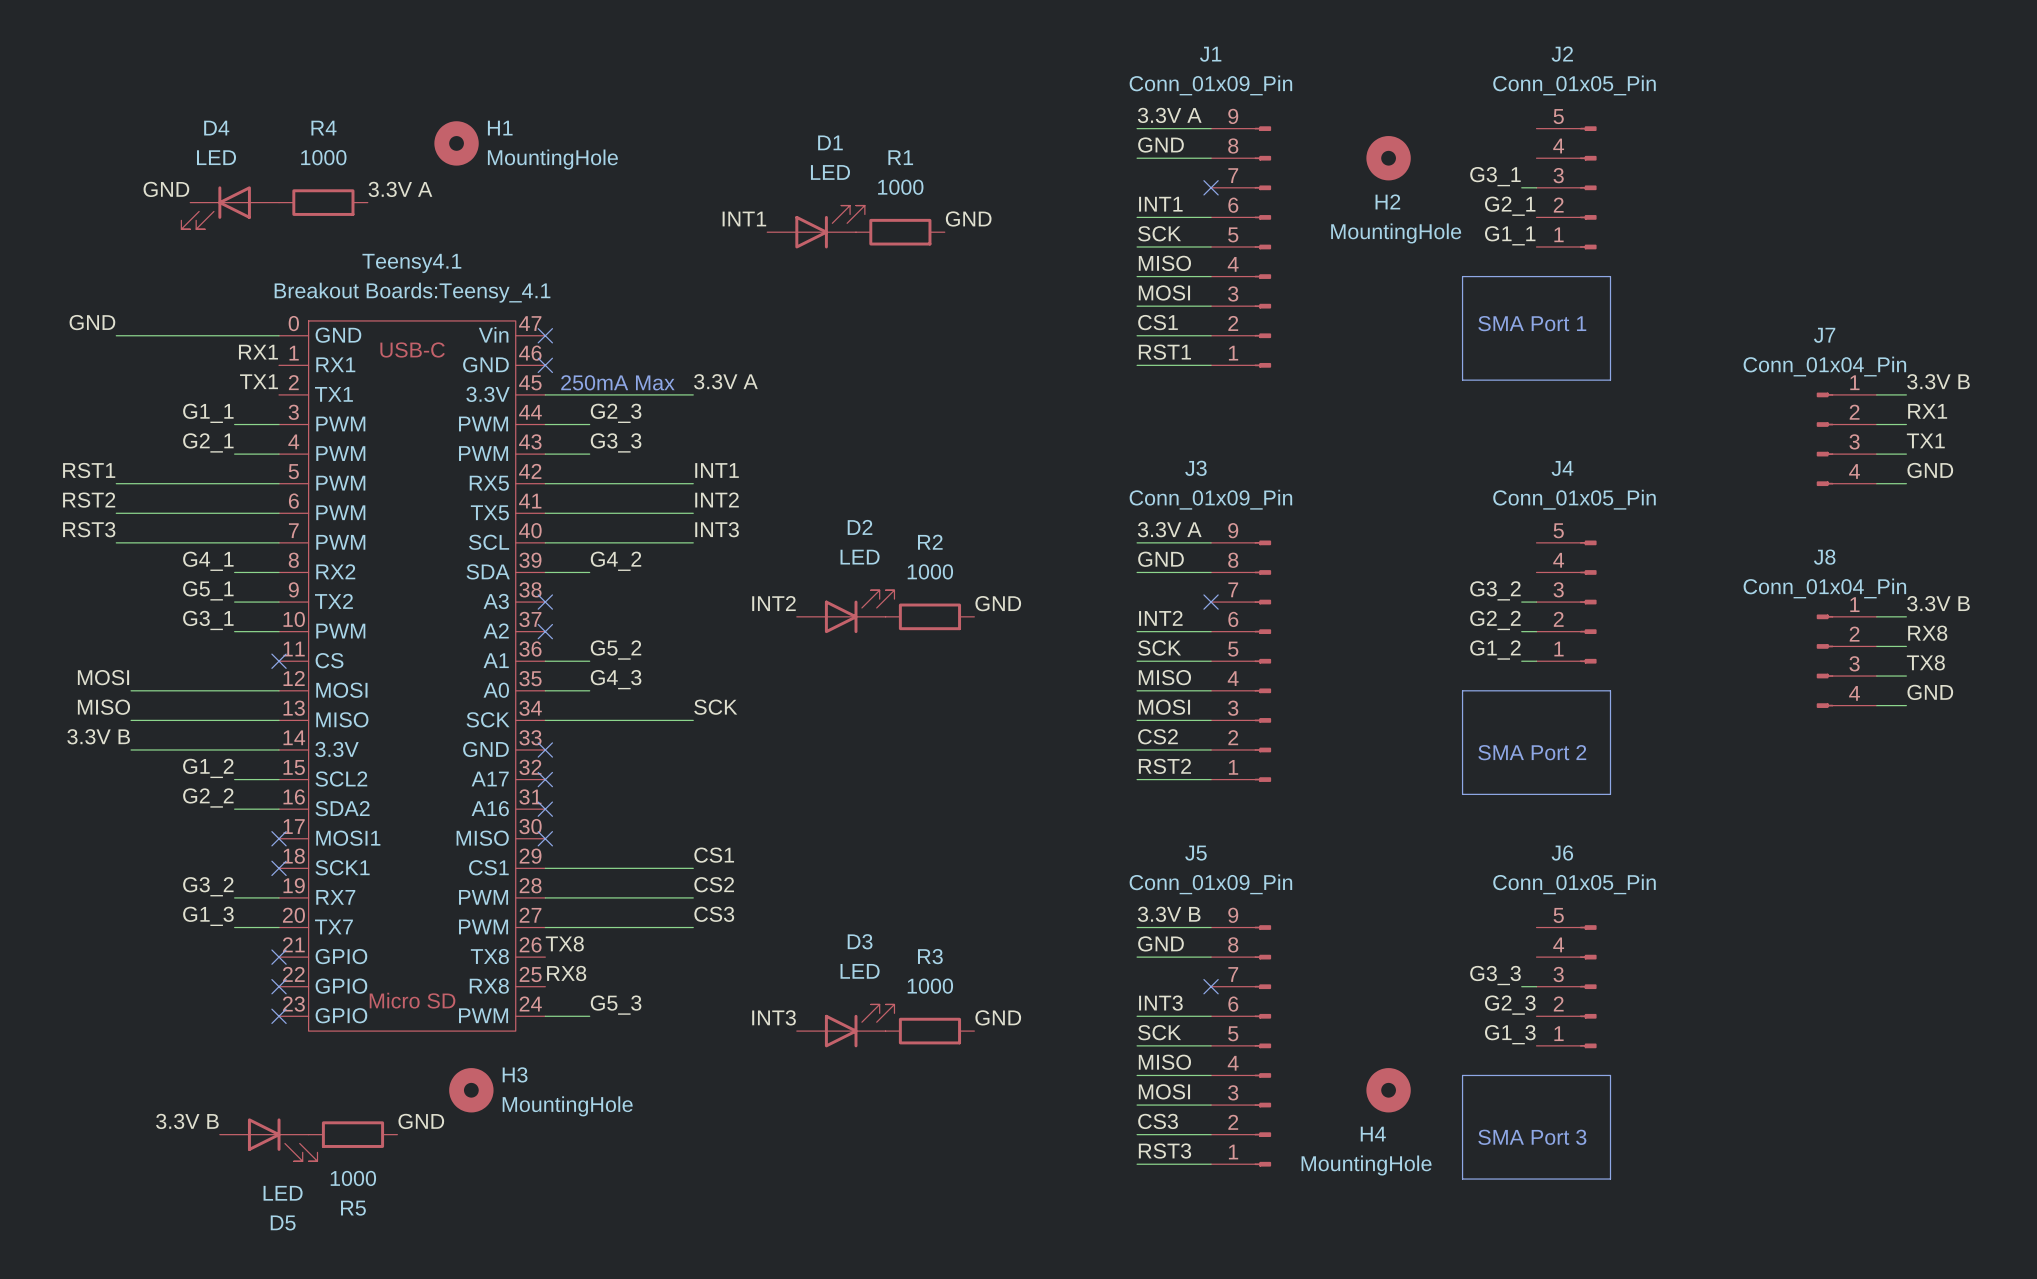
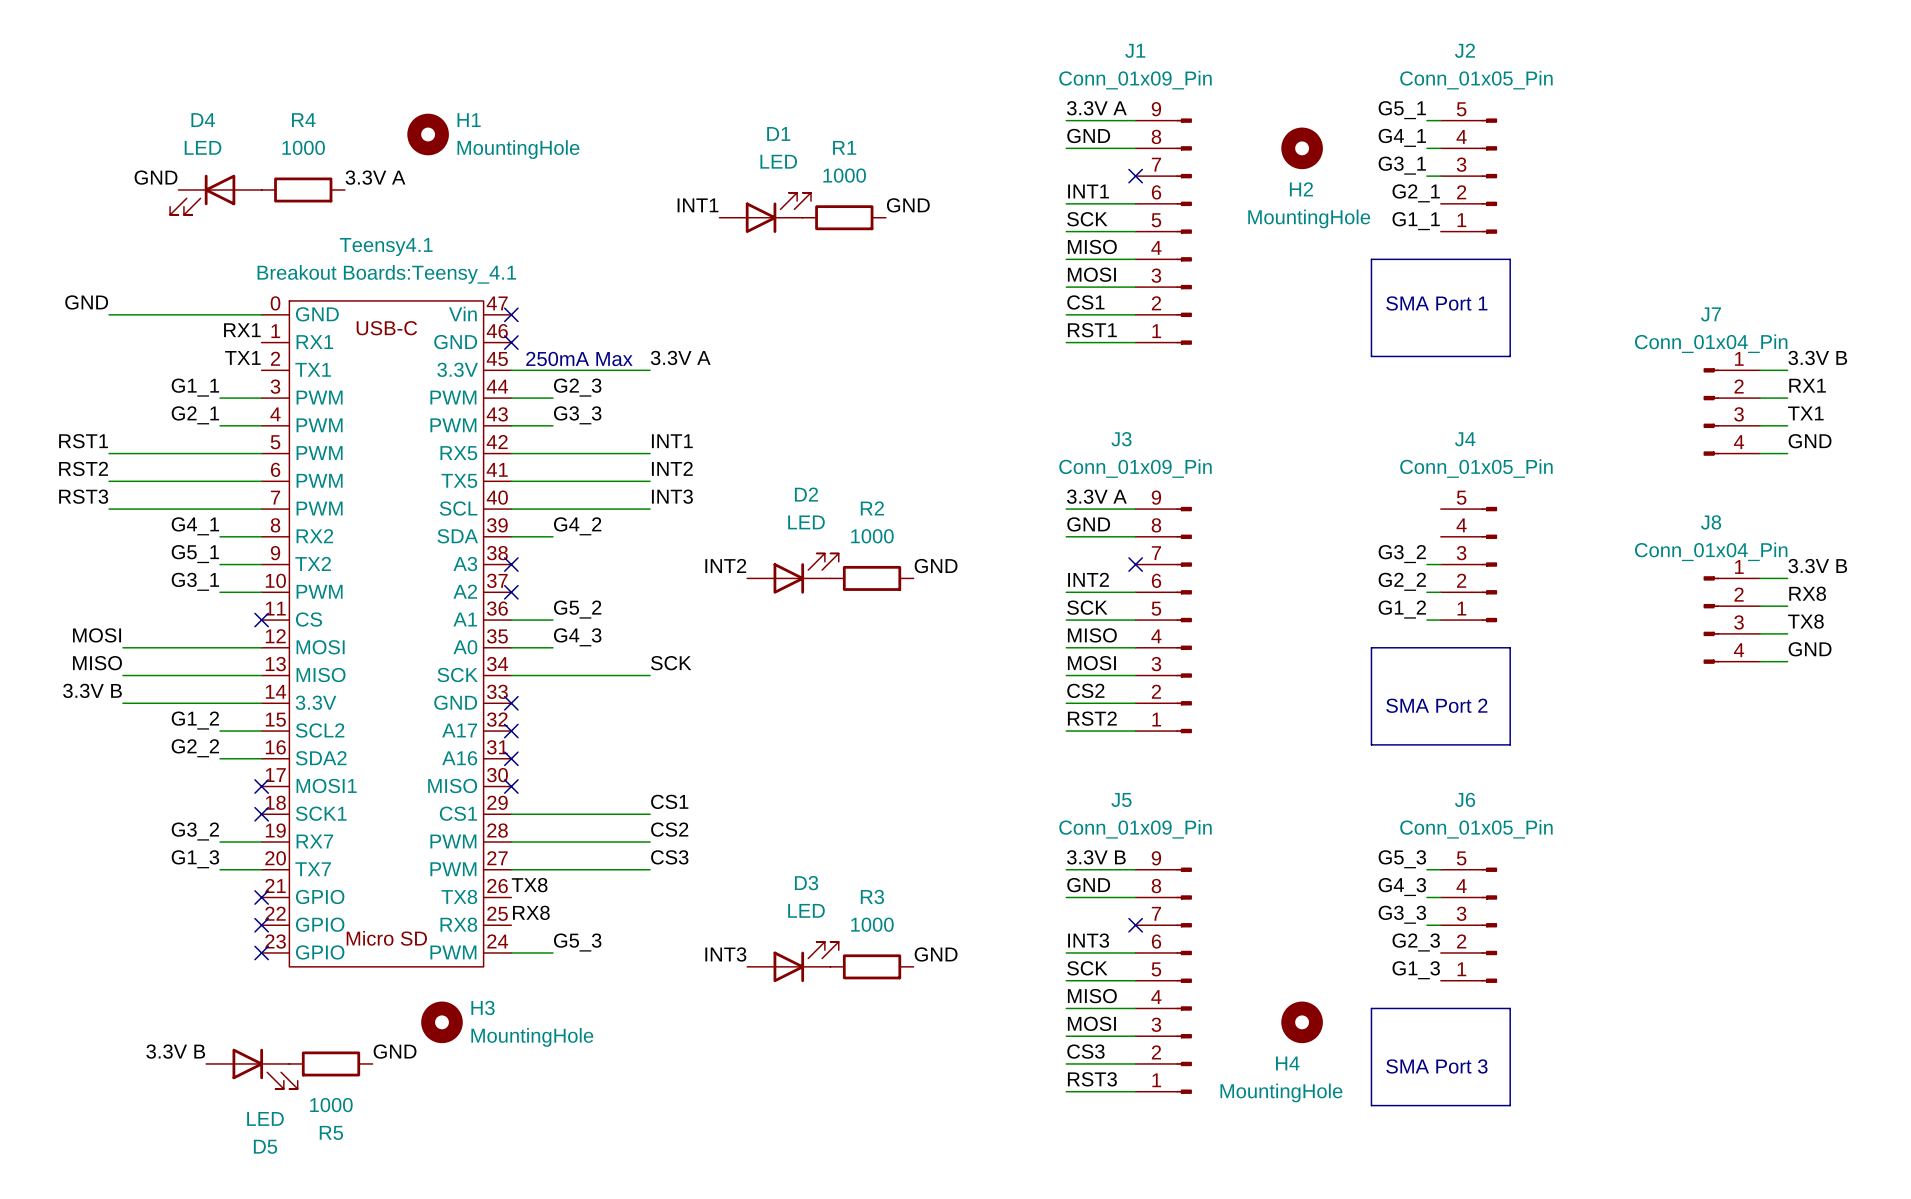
label: none -> G5_1 (1402, 110)
wire: none -> (1426, 120) (1440, 120)
label: none -> G4_1 (1402, 137)
wire: none -> (1426, 148) (1440, 148)
label: none -> G5_3 (1402, 859)
wire: none -> (1426, 869) (1440, 869)
label: none -> G4_3 (1402, 887)
wire: none -> (1426, 897) (1440, 897)

